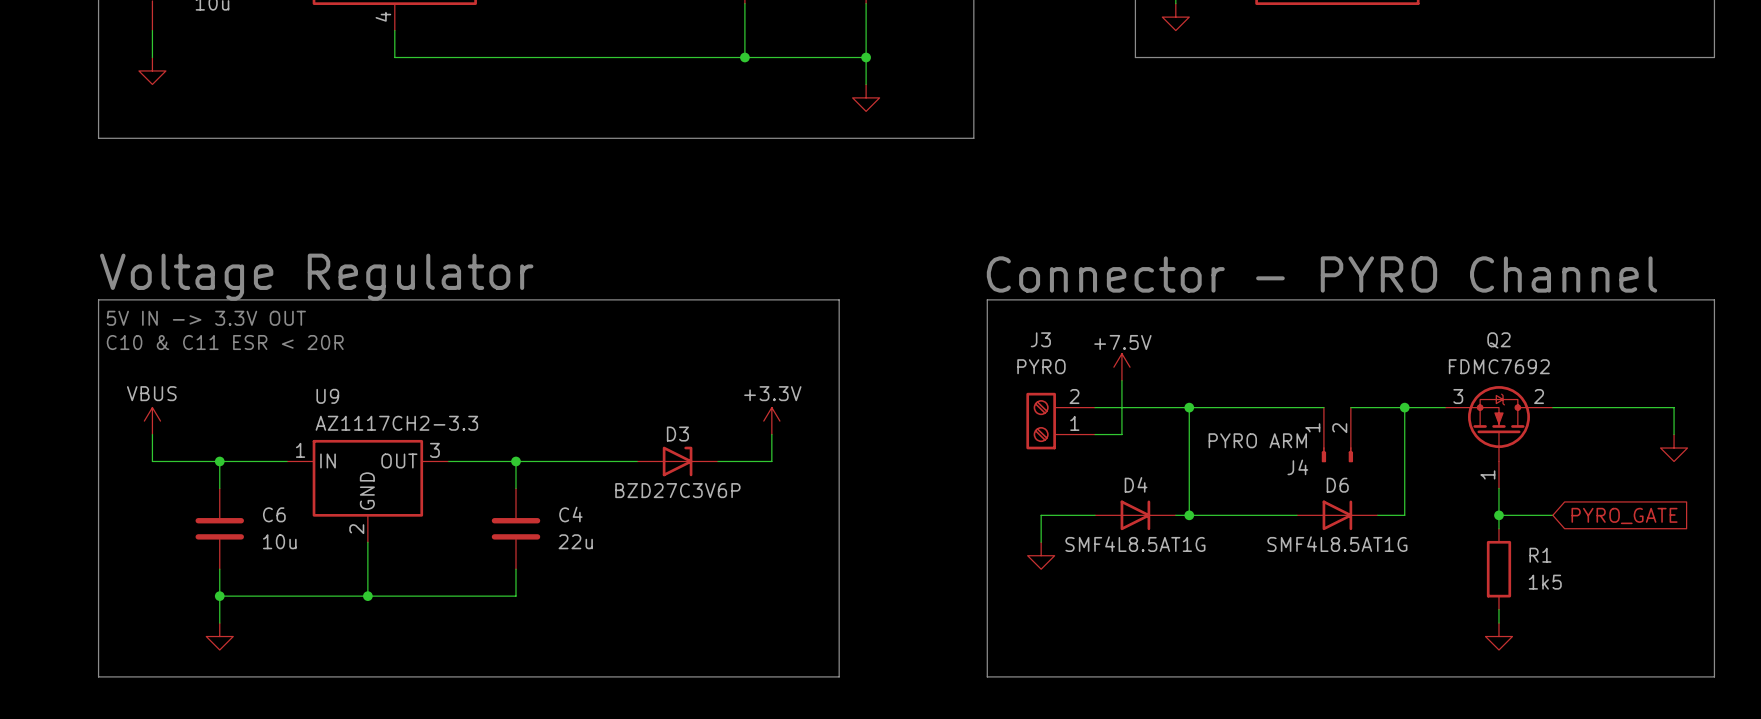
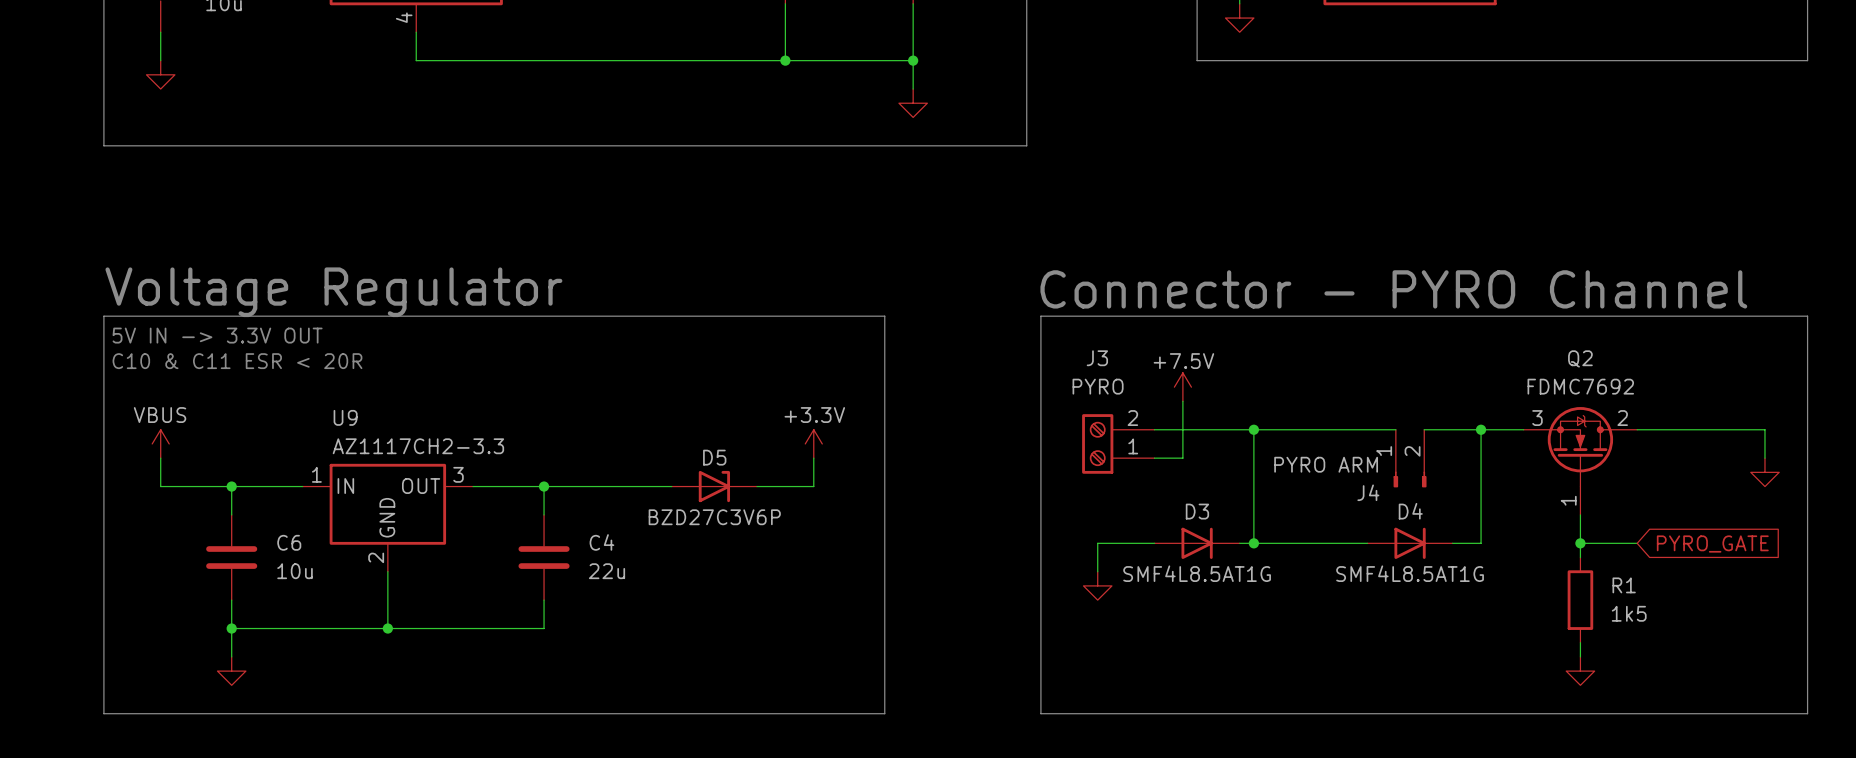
D3 name: D3 (677, 434) -> D5 (714, 457)
D4 name: D4 (1136, 484) -> D3 (1197, 511)
D6 name: D6 (1337, 485) -> D4 (1410, 511)

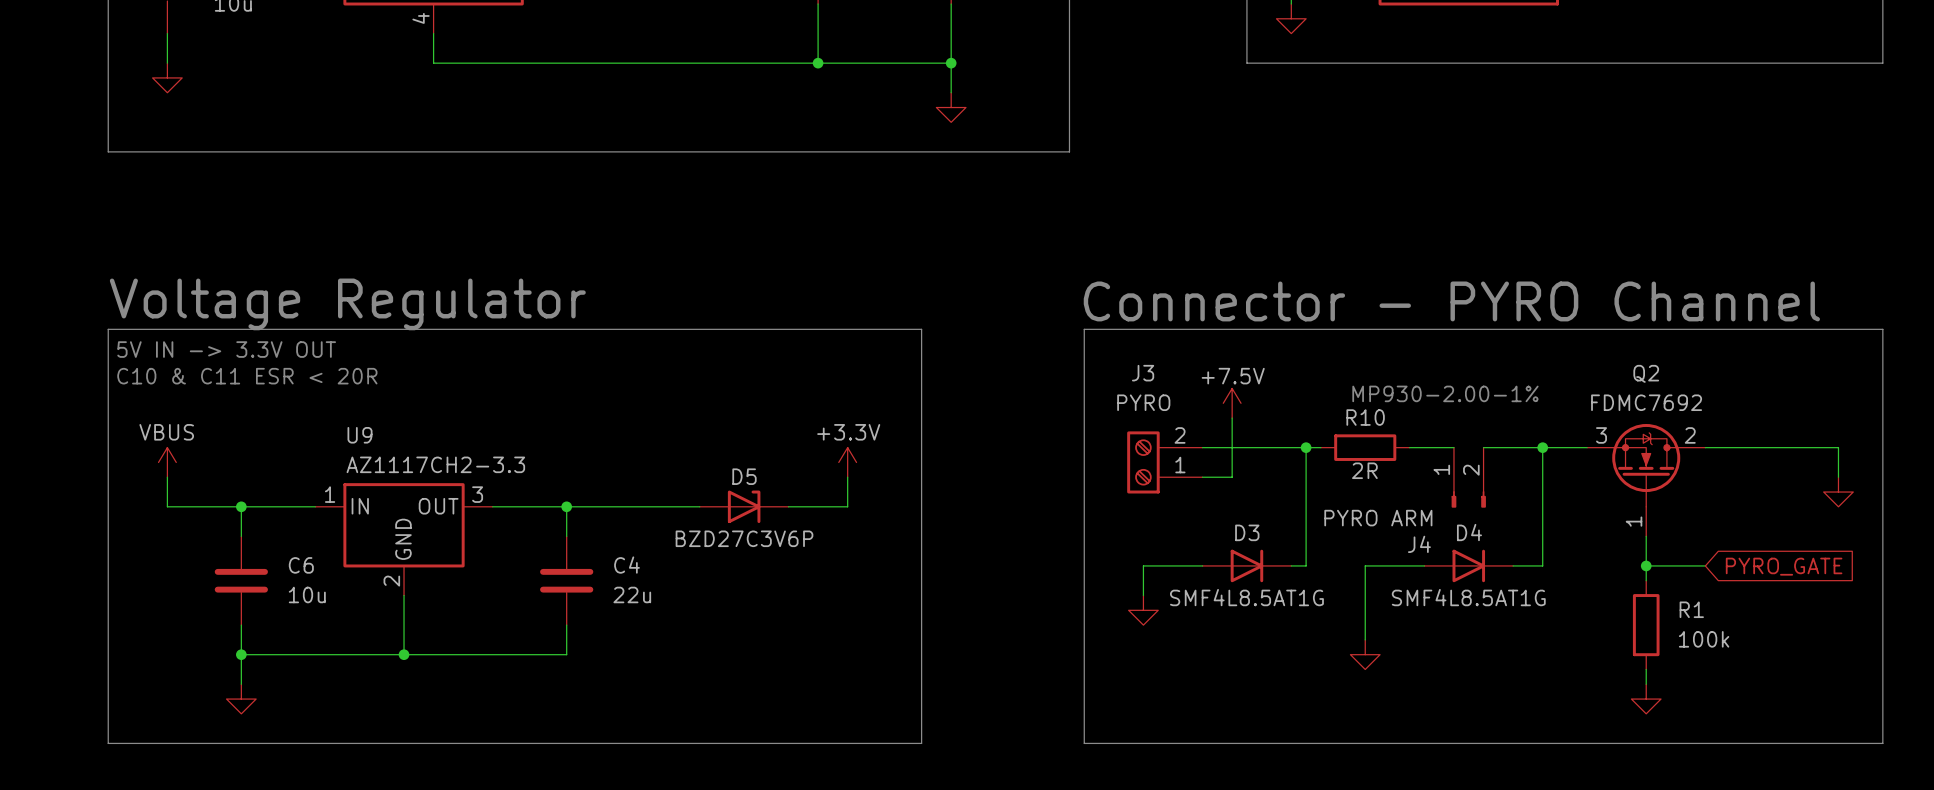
text: none -> MP930-2.00-1% (1445, 393)
wire: (1268, 429) (1353, 429) -> none
R10: none -> 2R (1365, 447)
J4 value position: PYRO ARM (1326, 464) -> PYRO ARM (1378, 518)
J4 name position: J4 (1368, 492) -> J4 (1419, 544)
wire: (1253, 543) (1310, 543) -> (1365, 639) (1365, 565)
junction: (1253, 543) -> none
R1 value: 1k5 (1629, 613) -> 100k (1704, 639)
power symbol: none -> (1365, 654)

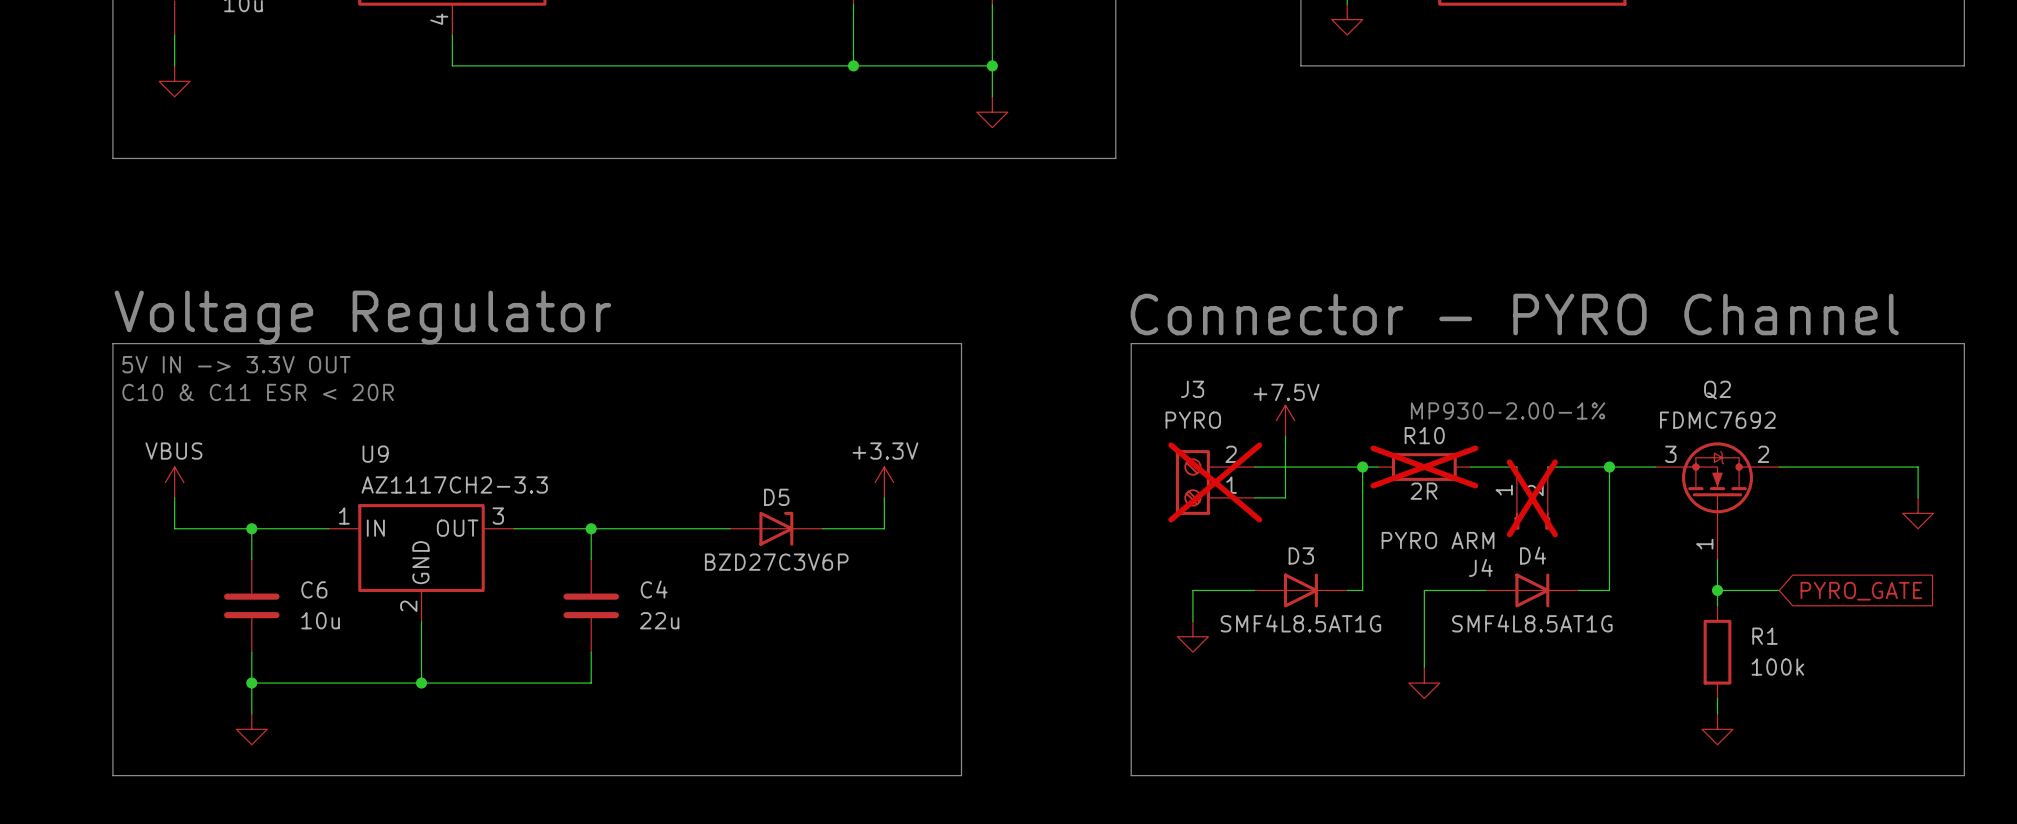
R10 do-not-place cross: none -> (1424, 467)
J3 do-not-place cross: none -> (1215, 482)
J4 do-not-place cross: none -> (1532, 498)

